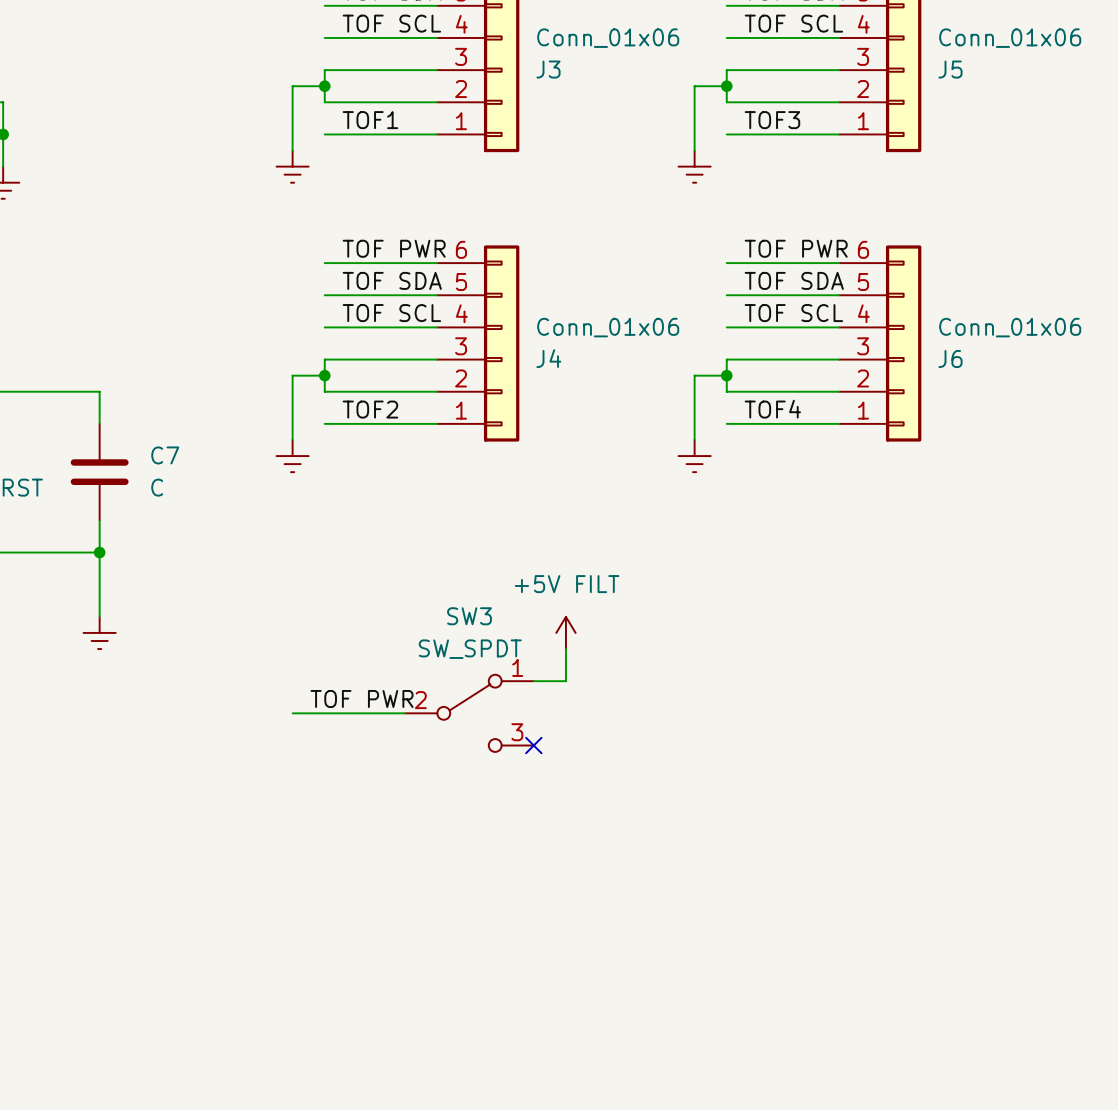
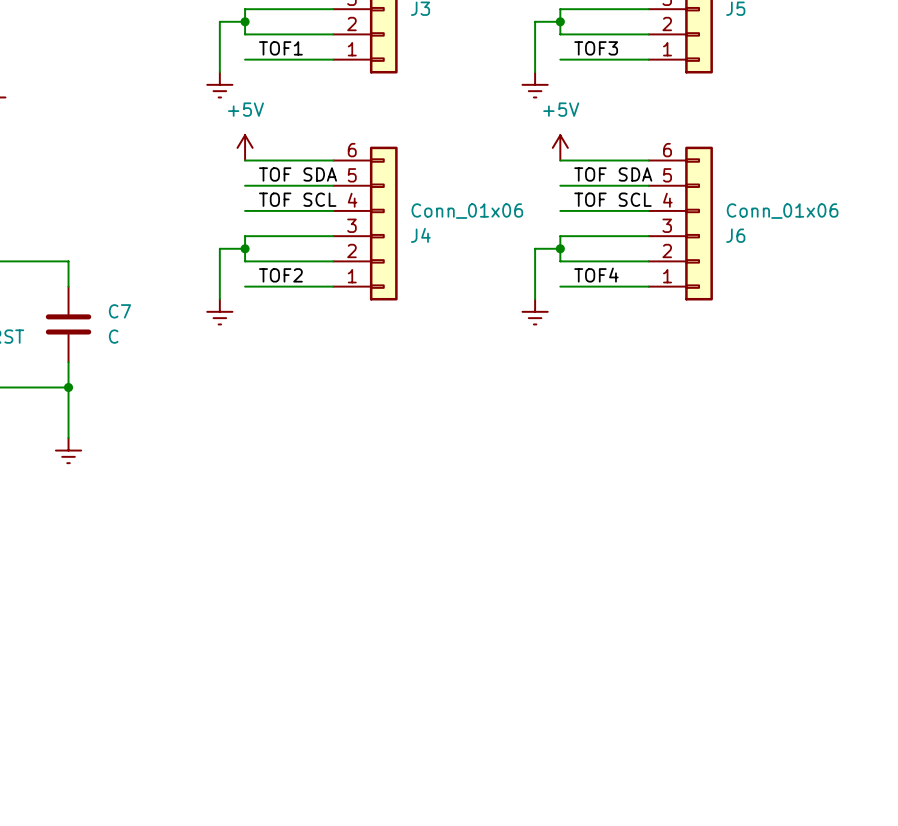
power symbol: none -> +5V (245, 147)
power symbol: none -> +5V (560, 147)
label: TOF PWR (394, 248) -> none
label: TOF PWR (796, 248) -> none
power symbol: +5V FILT (565, 632) -> none
wire: (565, 649) (565, 681) (533, 681) -> none
label: TOF PWR (362, 698) -> none
wire: (292, 713) (405, 713) -> none
SW3: SW_SPDT (469, 713) -> none
no-connect mark: (533, 745) -> none

